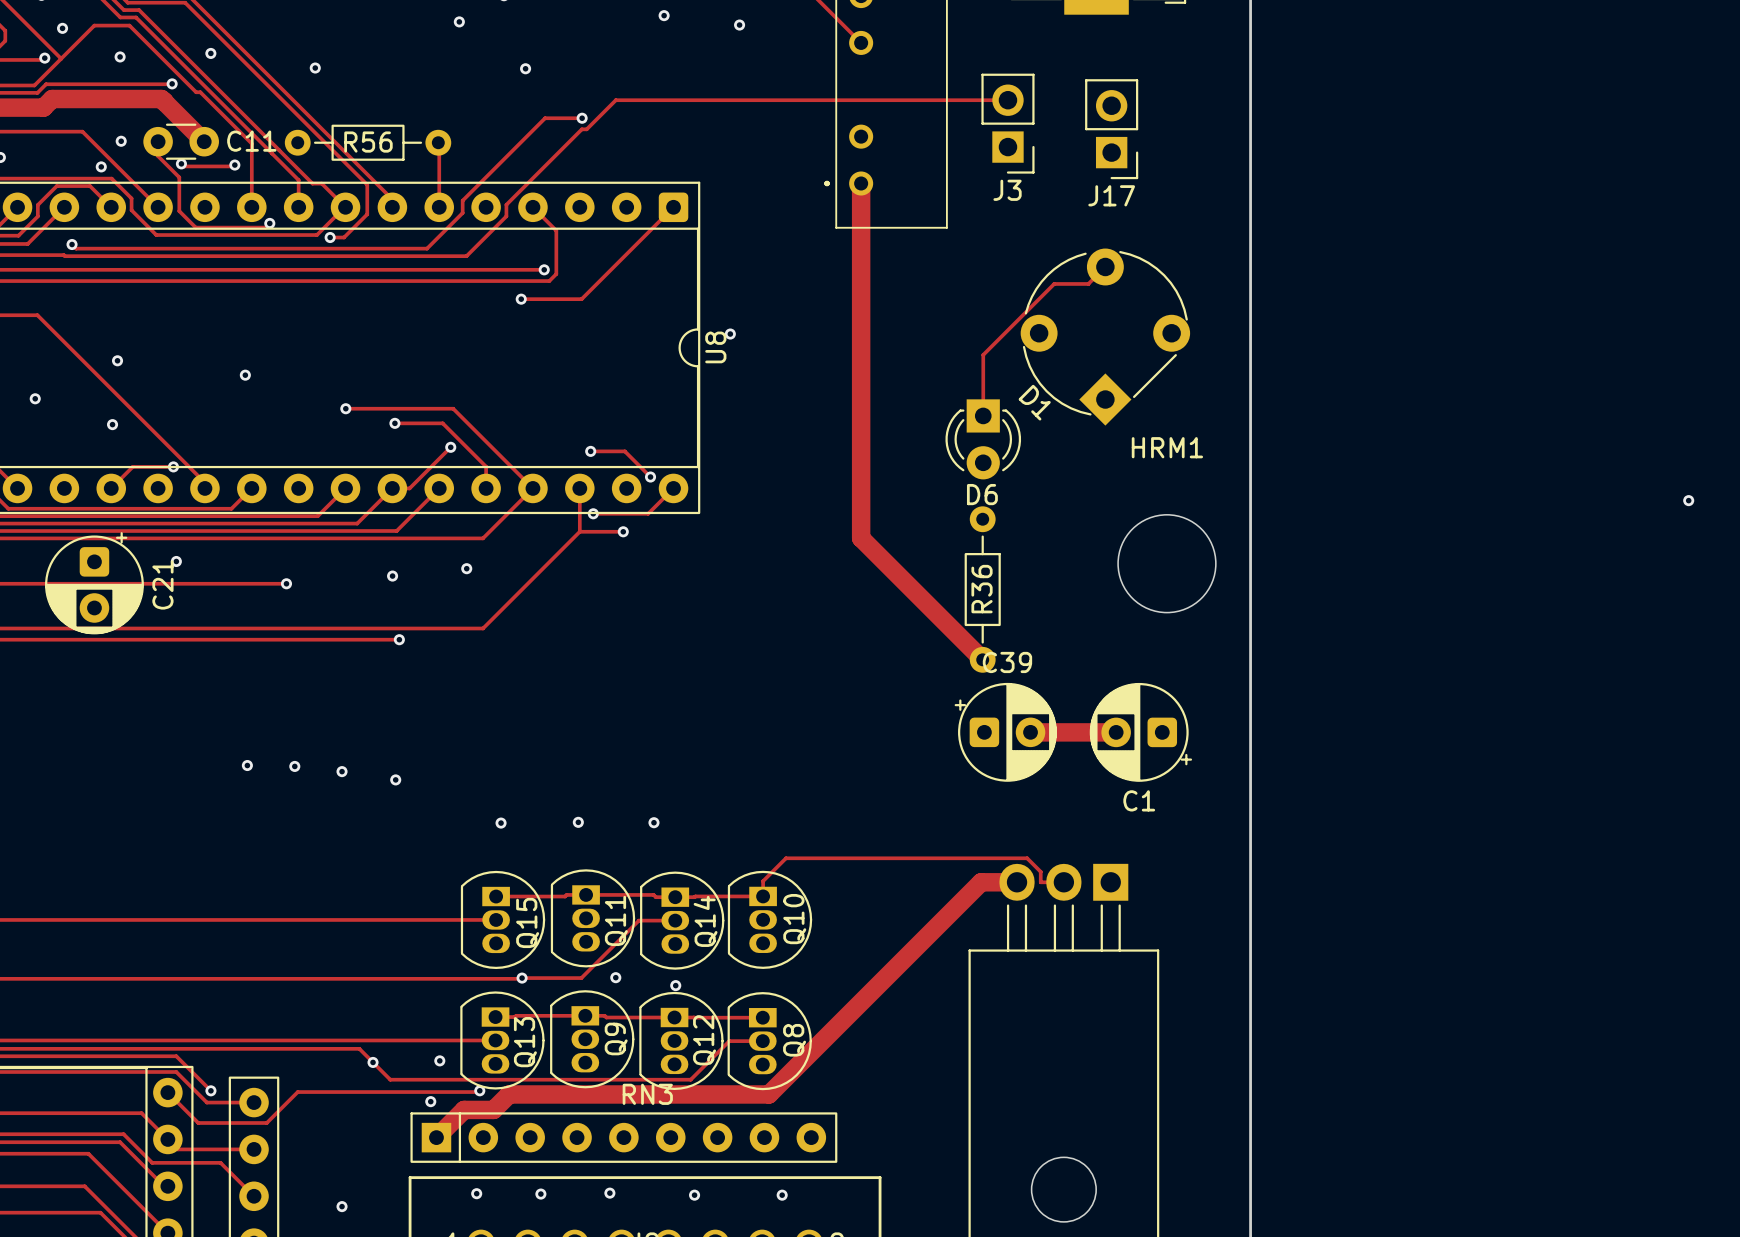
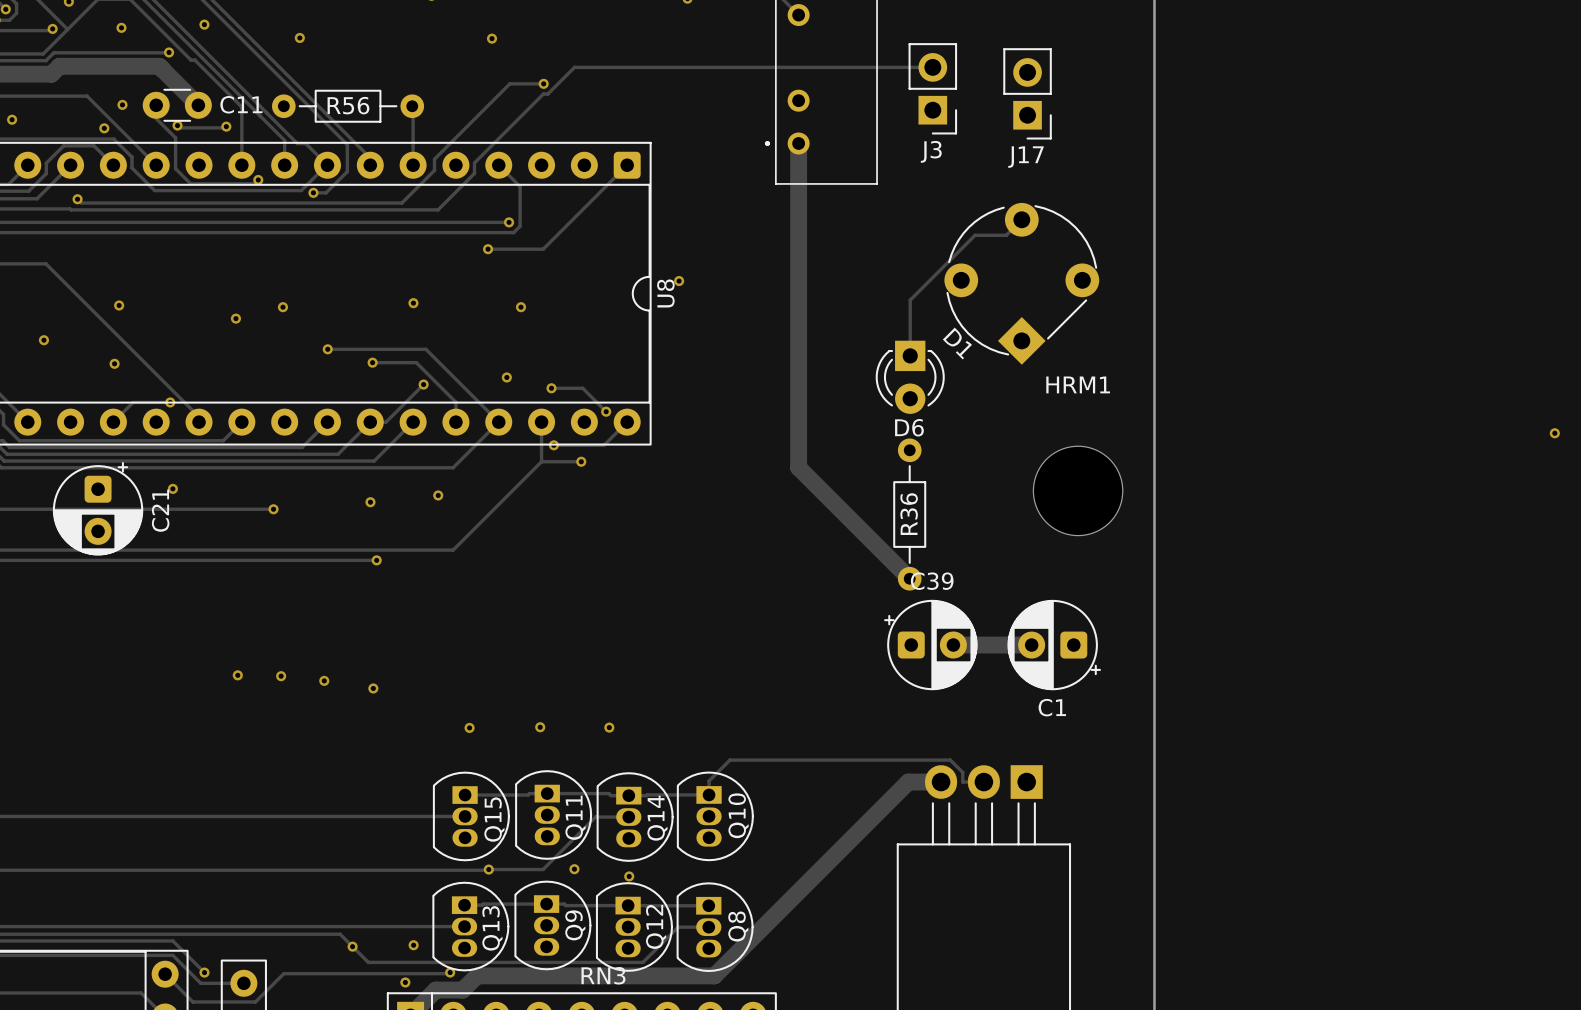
via: none -> (413, 303)
via: none -> (282, 307)
via: none -> (521, 307)
via: none -> (506, 377)

